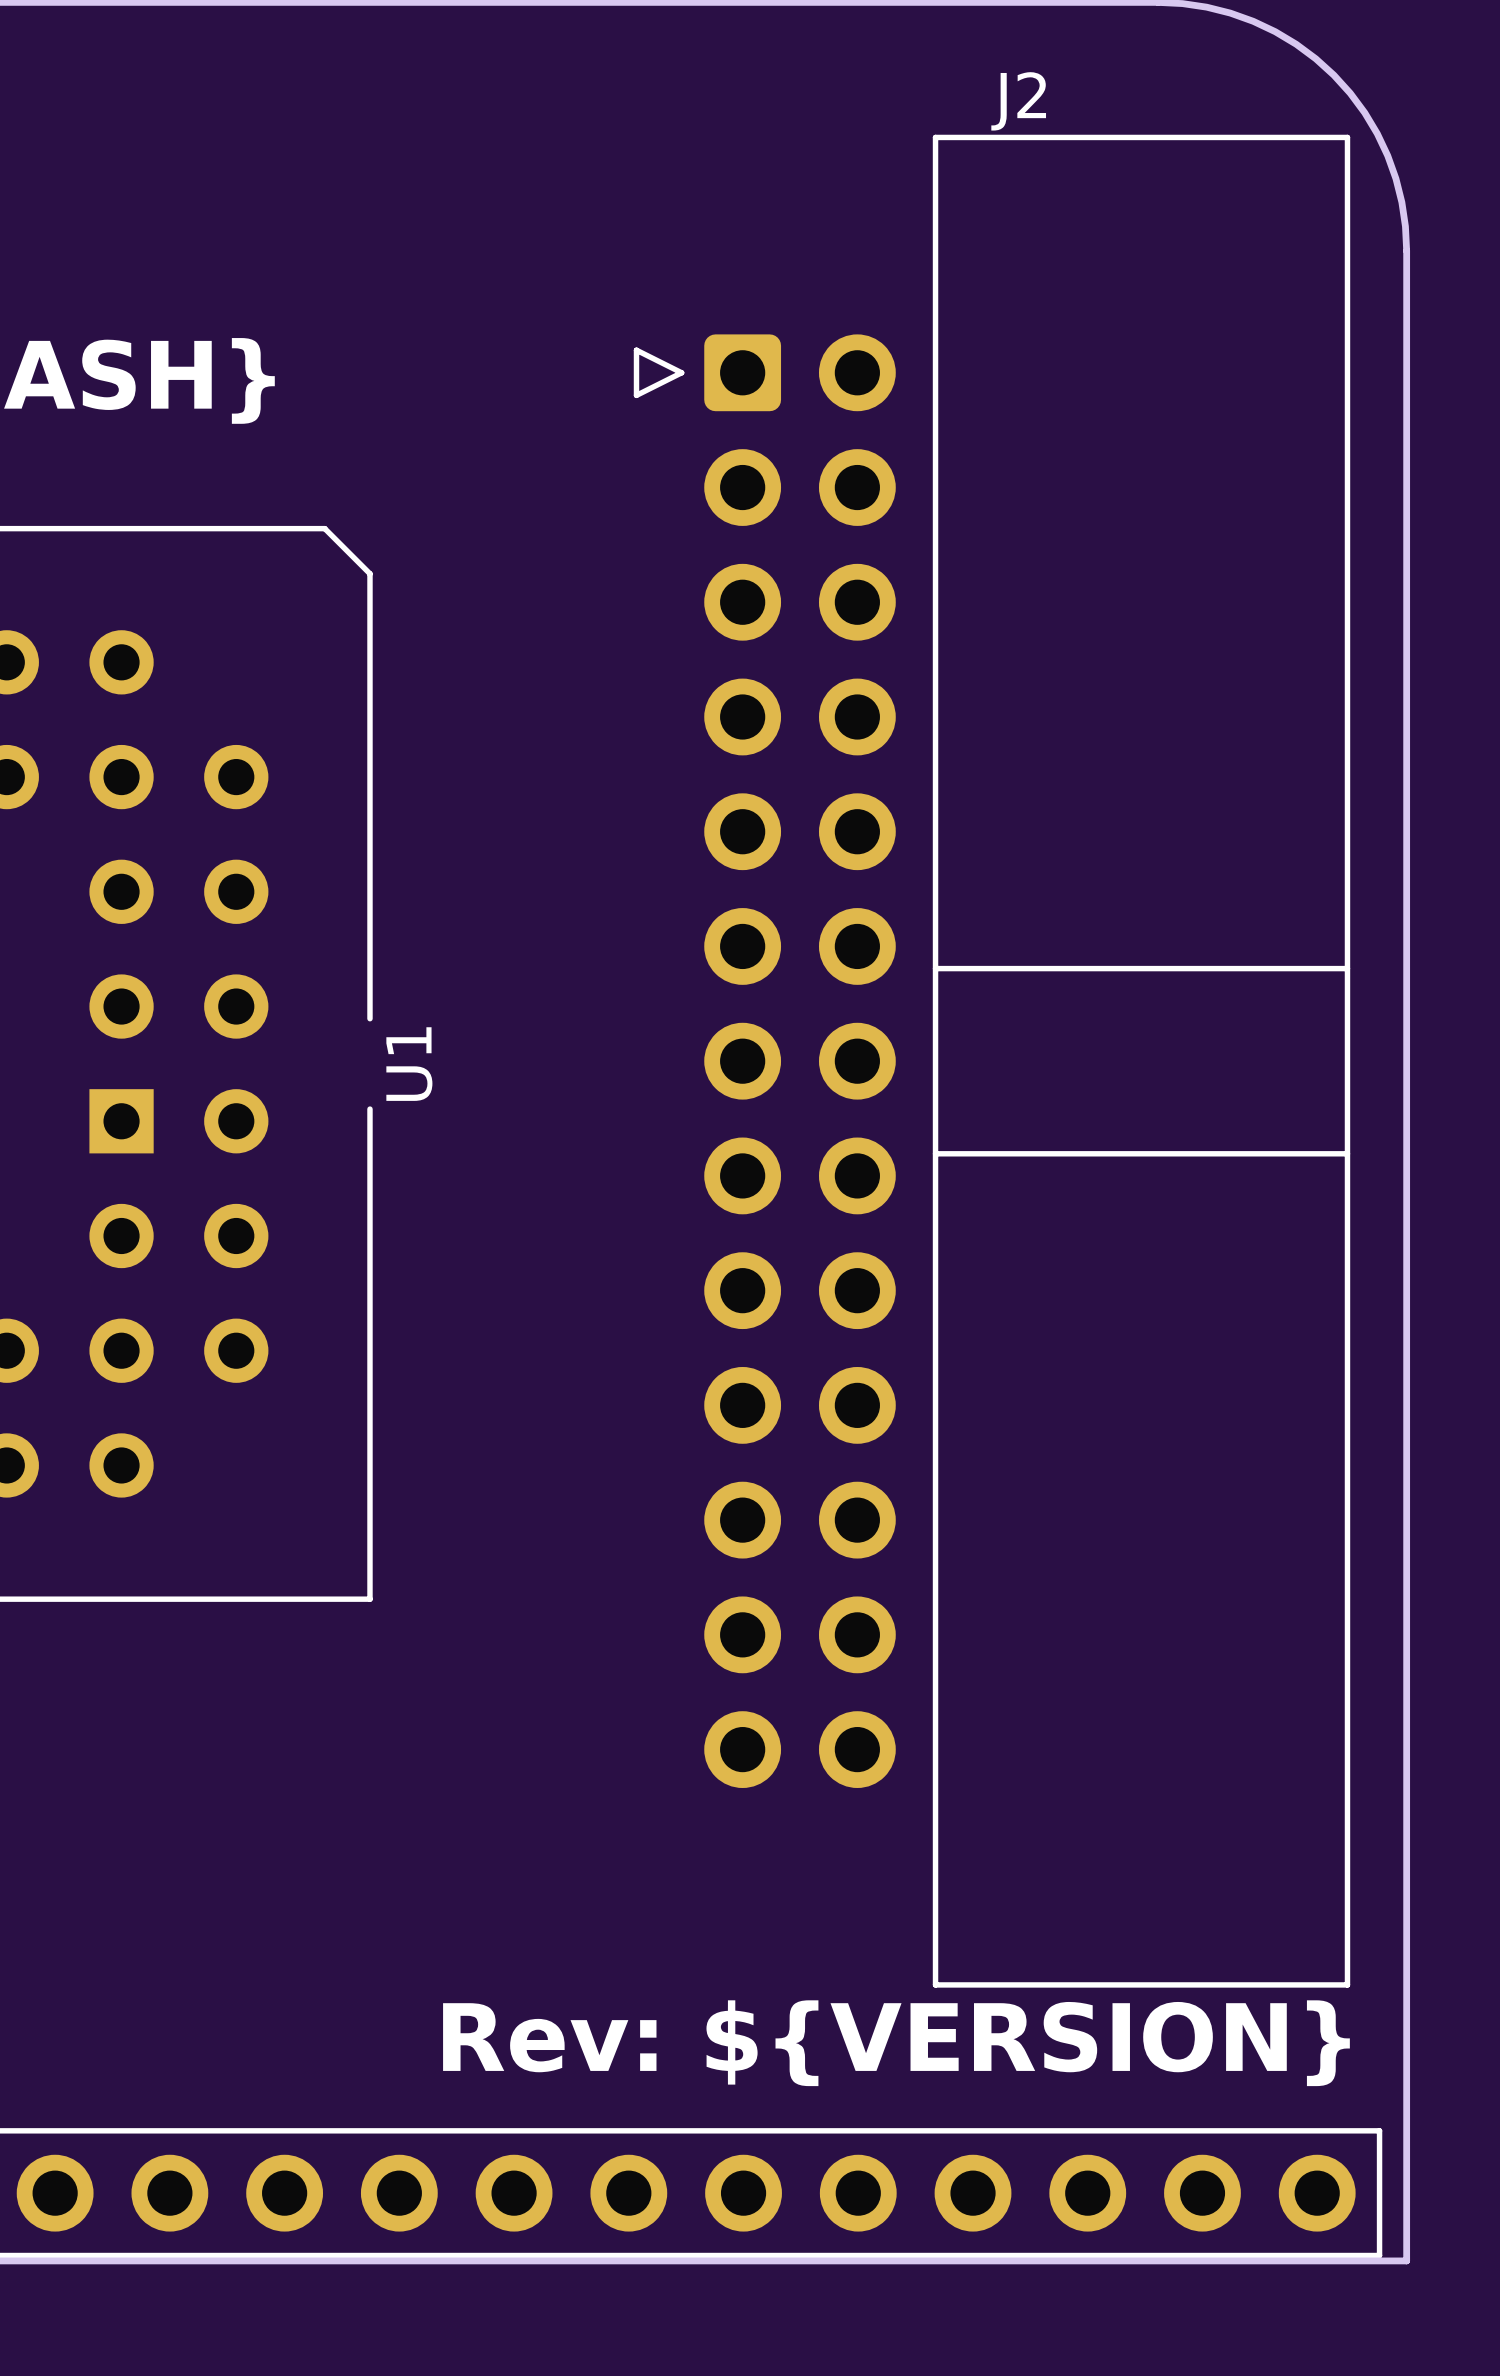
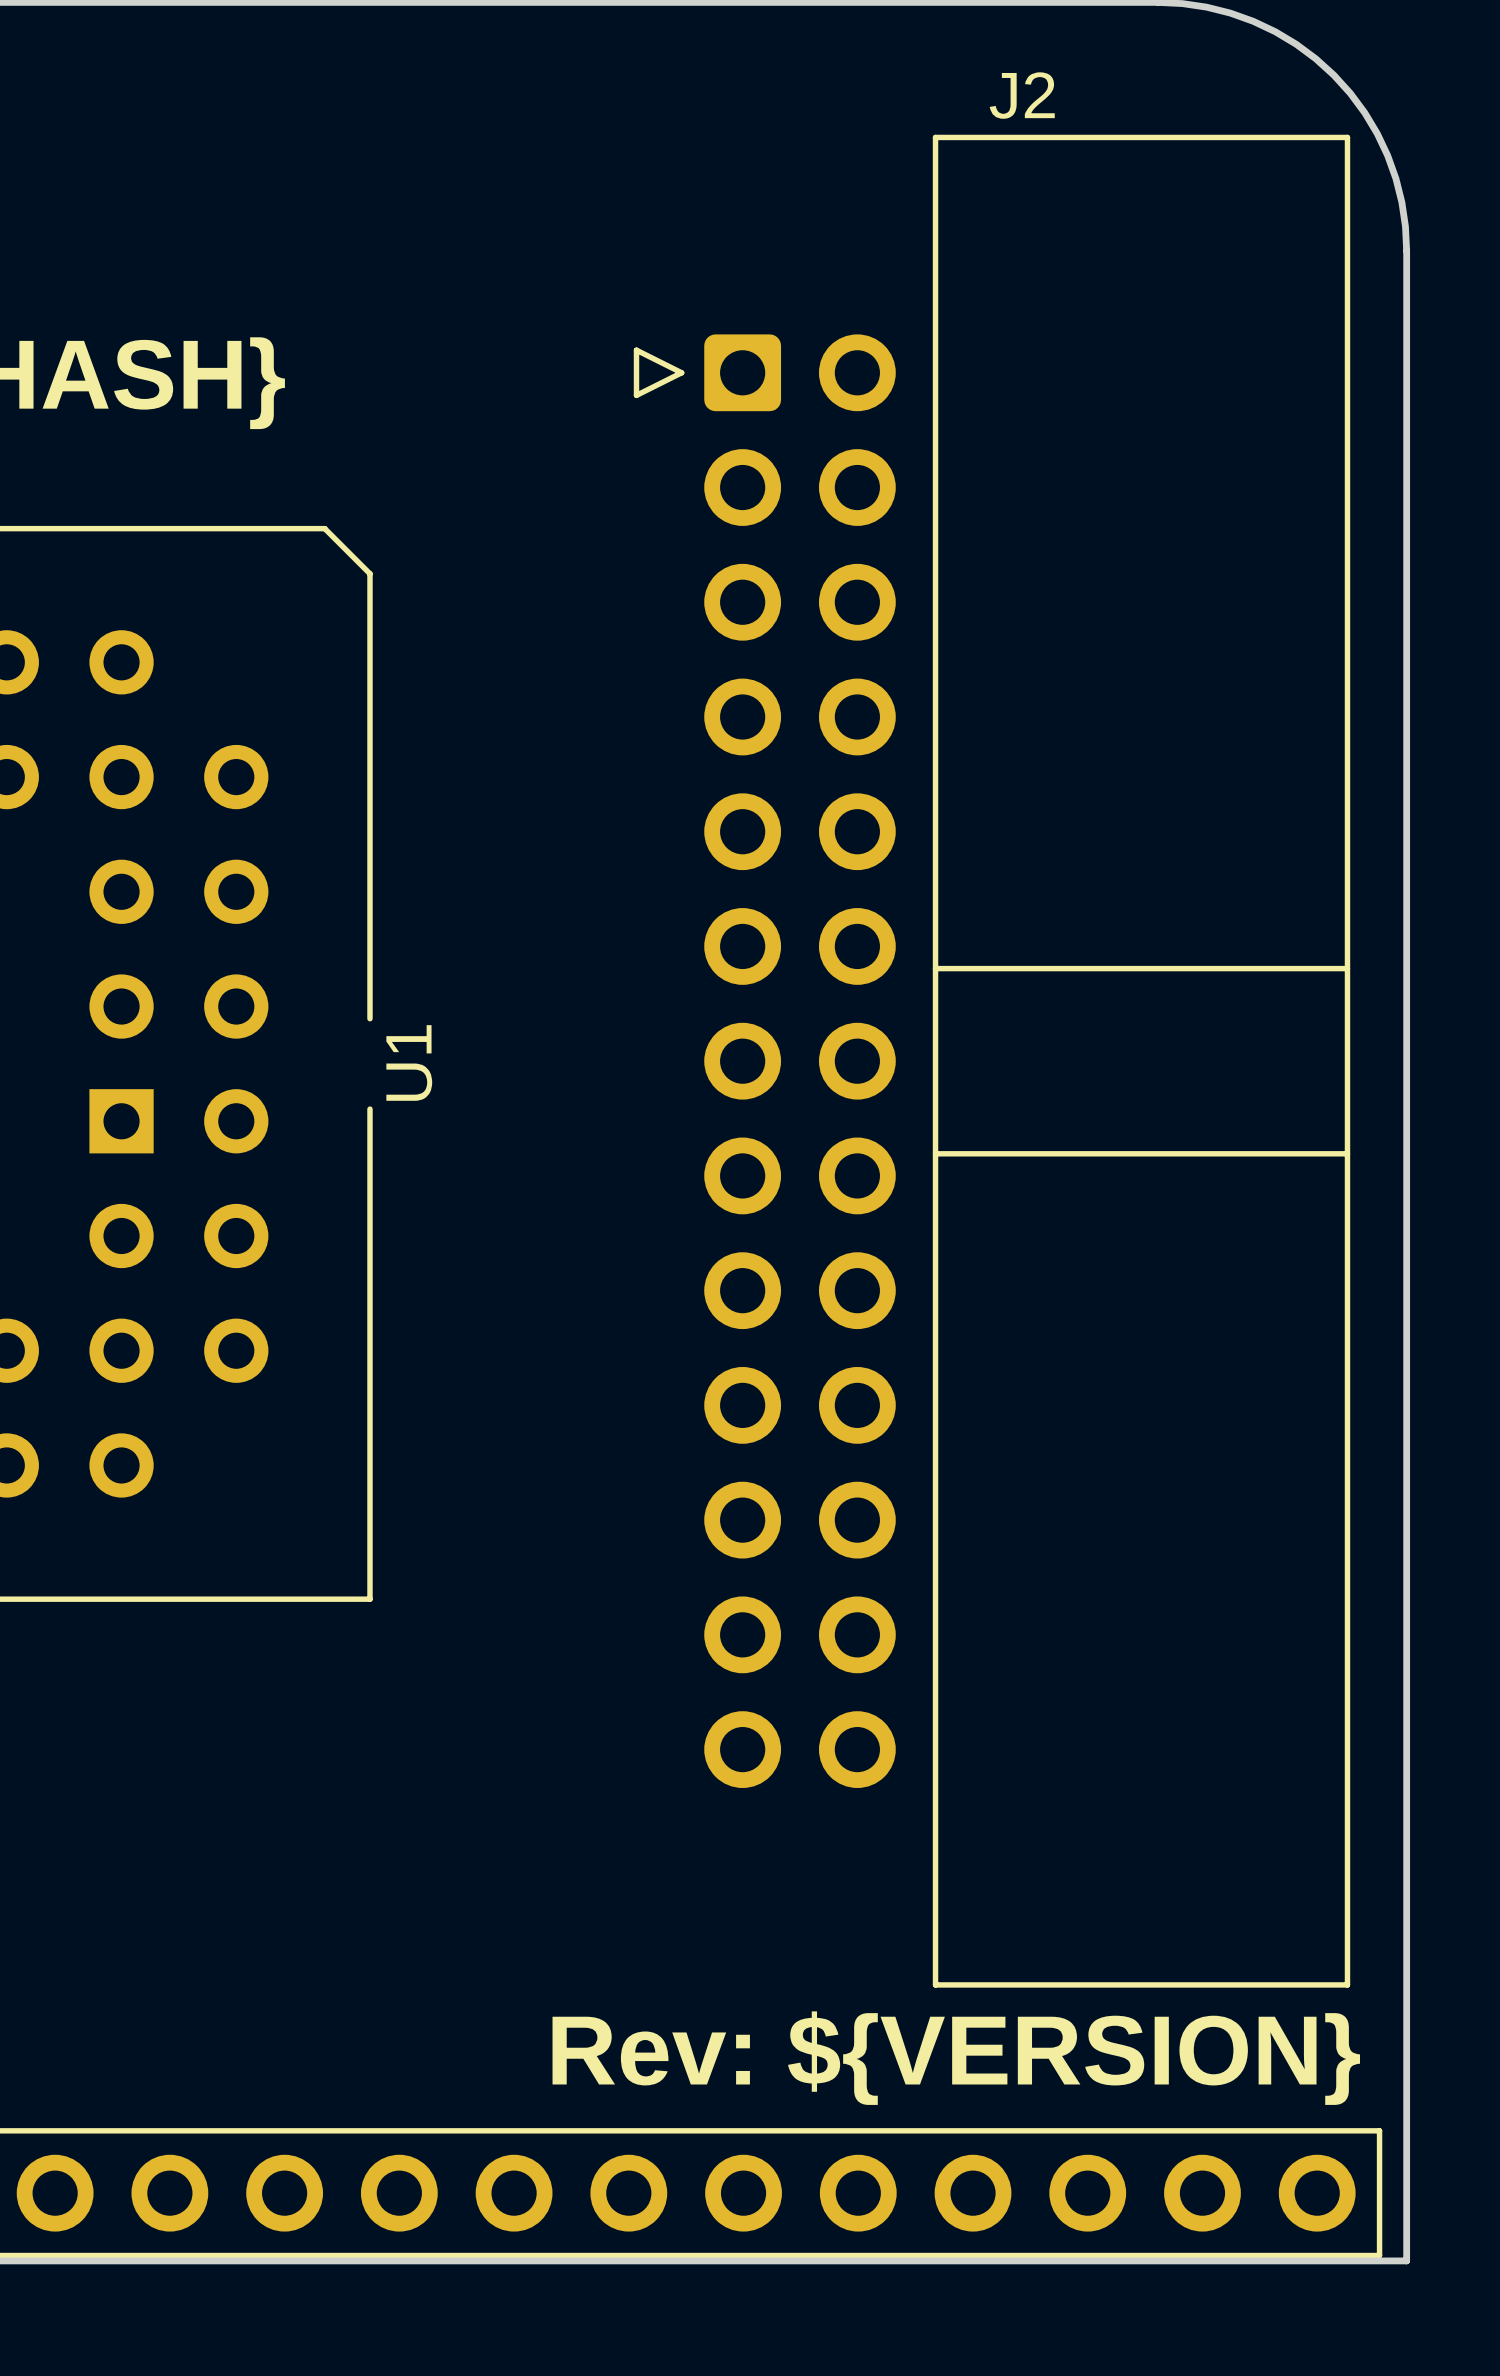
text position: Rev: ${VERSION} (896, 2043) -> Rev: ${VERSION} (956, 2058)

